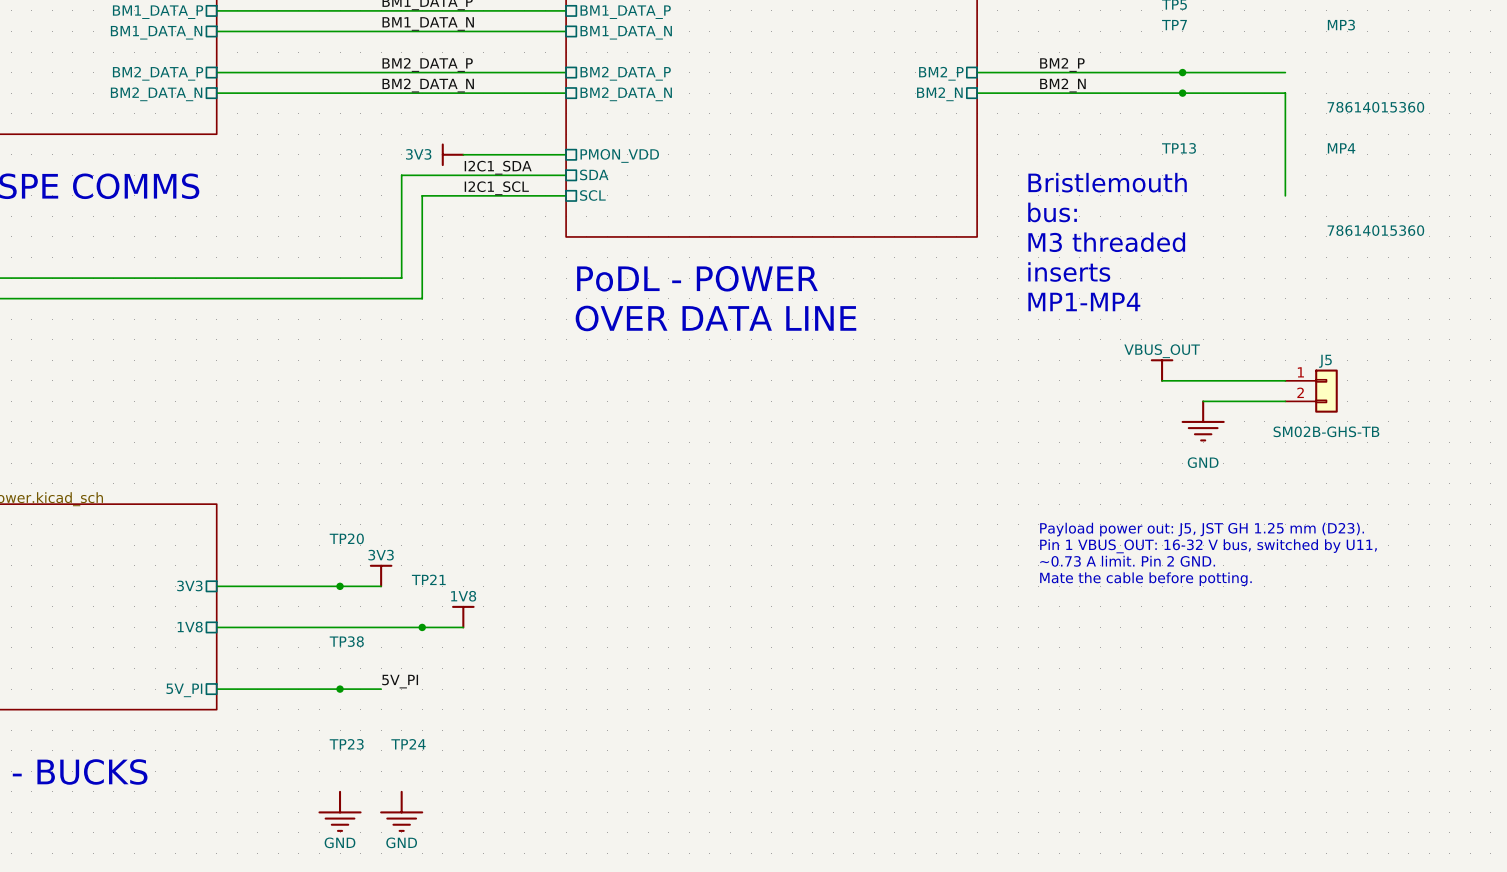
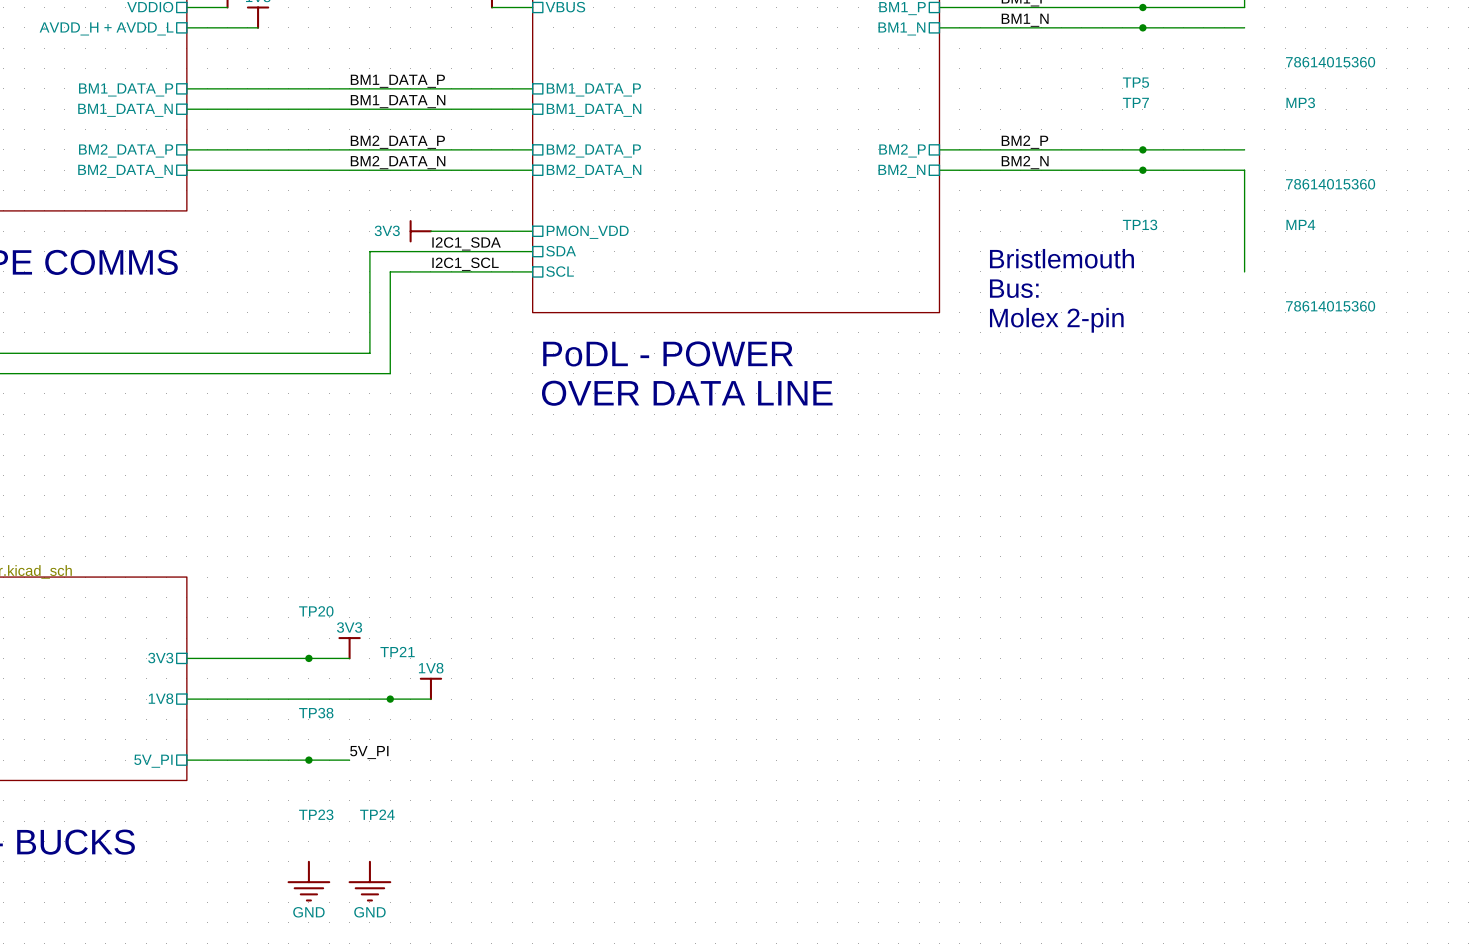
text: bus: (1052, 212) -> Bus: (1014, 288)
text: M3 threaded (1106, 242) -> Molex 2-pin (1056, 320)
text: inserts (1069, 272) -> none
text: MP1-MP4 (1084, 301) -> none
power symbol: VBUS_OUT (1162, 370) -> none
wire: (1162, 380) (1285, 380) -> none
J5: SM02B-GHS-TB (1311, 391) -> none
wire: (1203, 401) (1285, 401) -> none
power symbol: GND (1203, 420) -> none
text: Payload power out: J5, JST GH 1.25 mm (D23). (1202, 529) -> none
text: Pin 1 VBUS_OUT: 16-32 V bus, switched by U11, (1208, 546) -> none
text: ~0.73 A limit. Pin 2 GND. (1127, 561) -> none
text: Mate the cable before potting. (1145, 579) -> none

